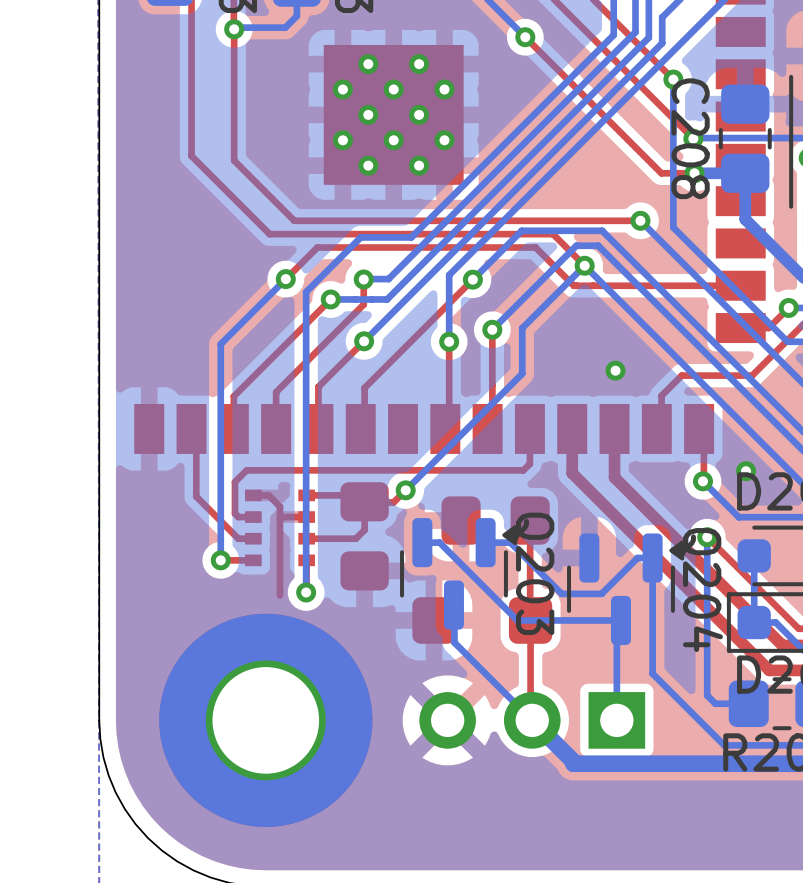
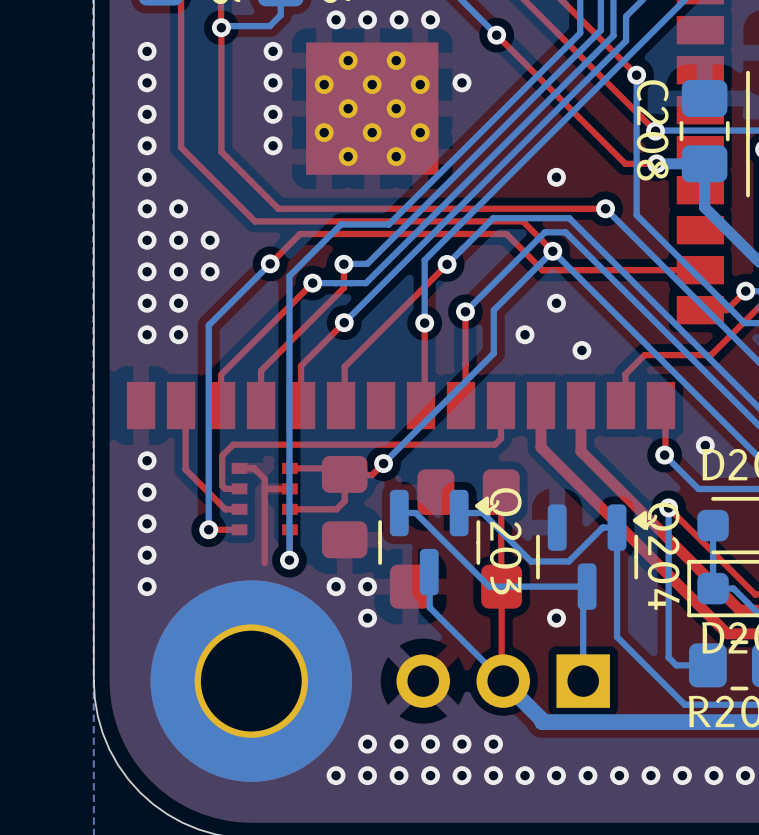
via: none -> (336, 19)
via: none -> (367, 19)
via: none -> (399, 19)
via: none -> (430, 19)
via: none -> (147, 51)
via: none -> (273, 51)
via: none -> (147, 82)
via: none -> (273, 82)
via: none -> (462, 82)
via: none -> (147, 114)
via: none -> (273, 114)
via: none -> (147, 145)
via: none -> (273, 145)
via: none -> (147, 177)
via: none -> (556, 177)
via: none -> (147, 208)
via: none -> (178, 208)
via: none -> (147, 240)
via: none -> (178, 240)
via: none -> (210, 240)
via: none -> (147, 271)
via: none -> (178, 271)
via: none -> (210, 271)
via: none -> (147, 303)
via: none -> (178, 303)
via: none -> (556, 303)
via: none -> (147, 334)
via: none -> (178, 334)
via: none -> (525, 334)
via: none -> (147, 460)
via: none -> (147, 492)
via: none -> (147, 523)
via: none -> (147, 555)
via: none -> (147, 586)
via: none -> (336, 586)
via: none -> (367, 586)
via: none -> (367, 618)
via: none -> (556, 618)
via: none -> (367, 744)
via: none -> (399, 744)
via: none -> (430, 744)
via: none -> (462, 744)
via: none -> (493, 744)
via: none -> (336, 775)
via: none -> (367, 775)
via: none -> (399, 775)
via: none -> (430, 775)
via: none -> (462, 775)
via: none -> (493, 775)
via: none -> (525, 775)
via: none -> (556, 775)
via: none -> (587, 775)
via: none -> (619, 775)
via: none -> (650, 775)
via: none -> (682, 775)
via: none -> (713, 775)
via: none -> (745, 775)

